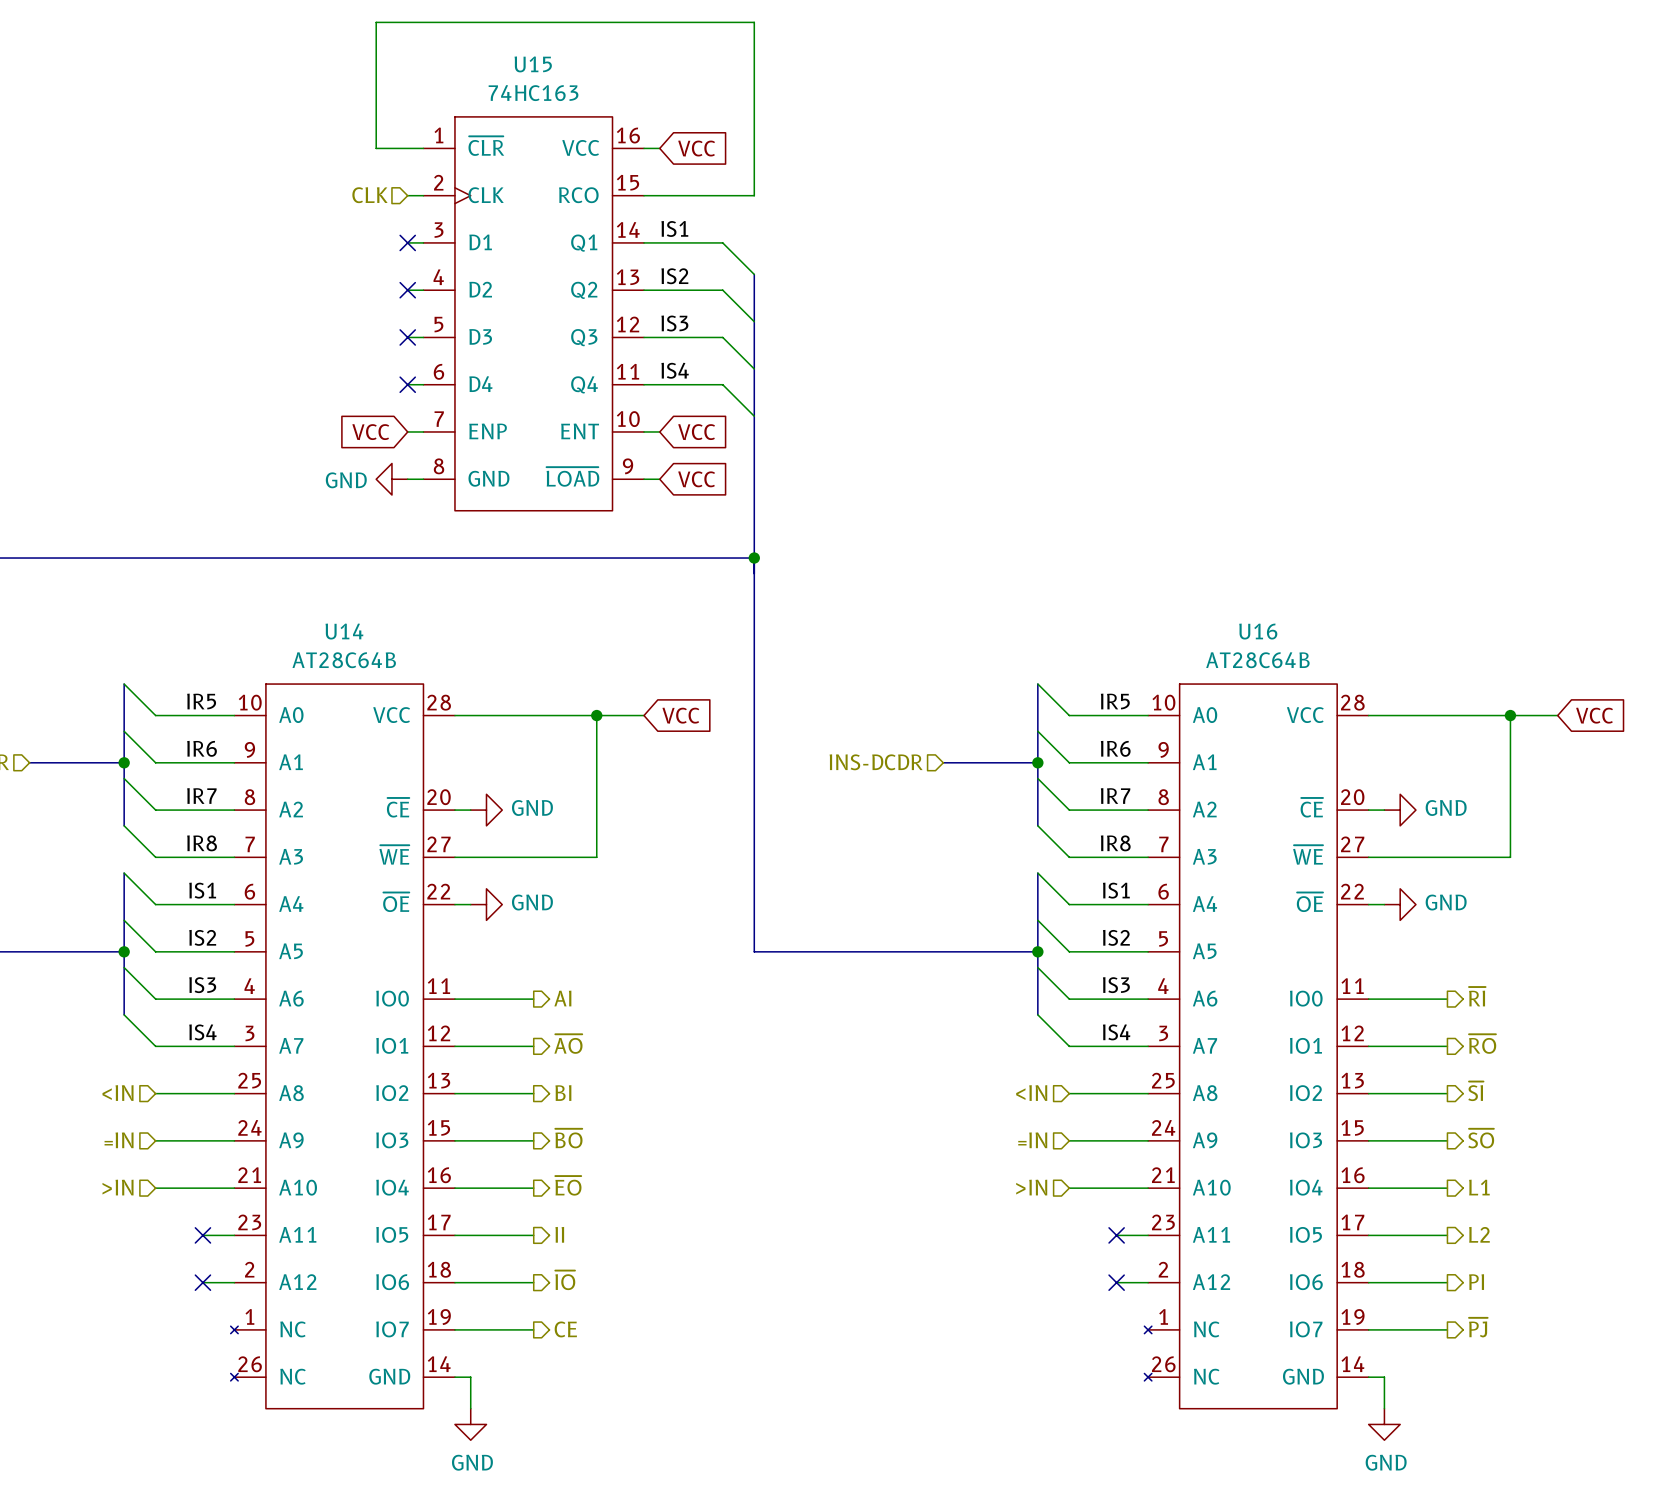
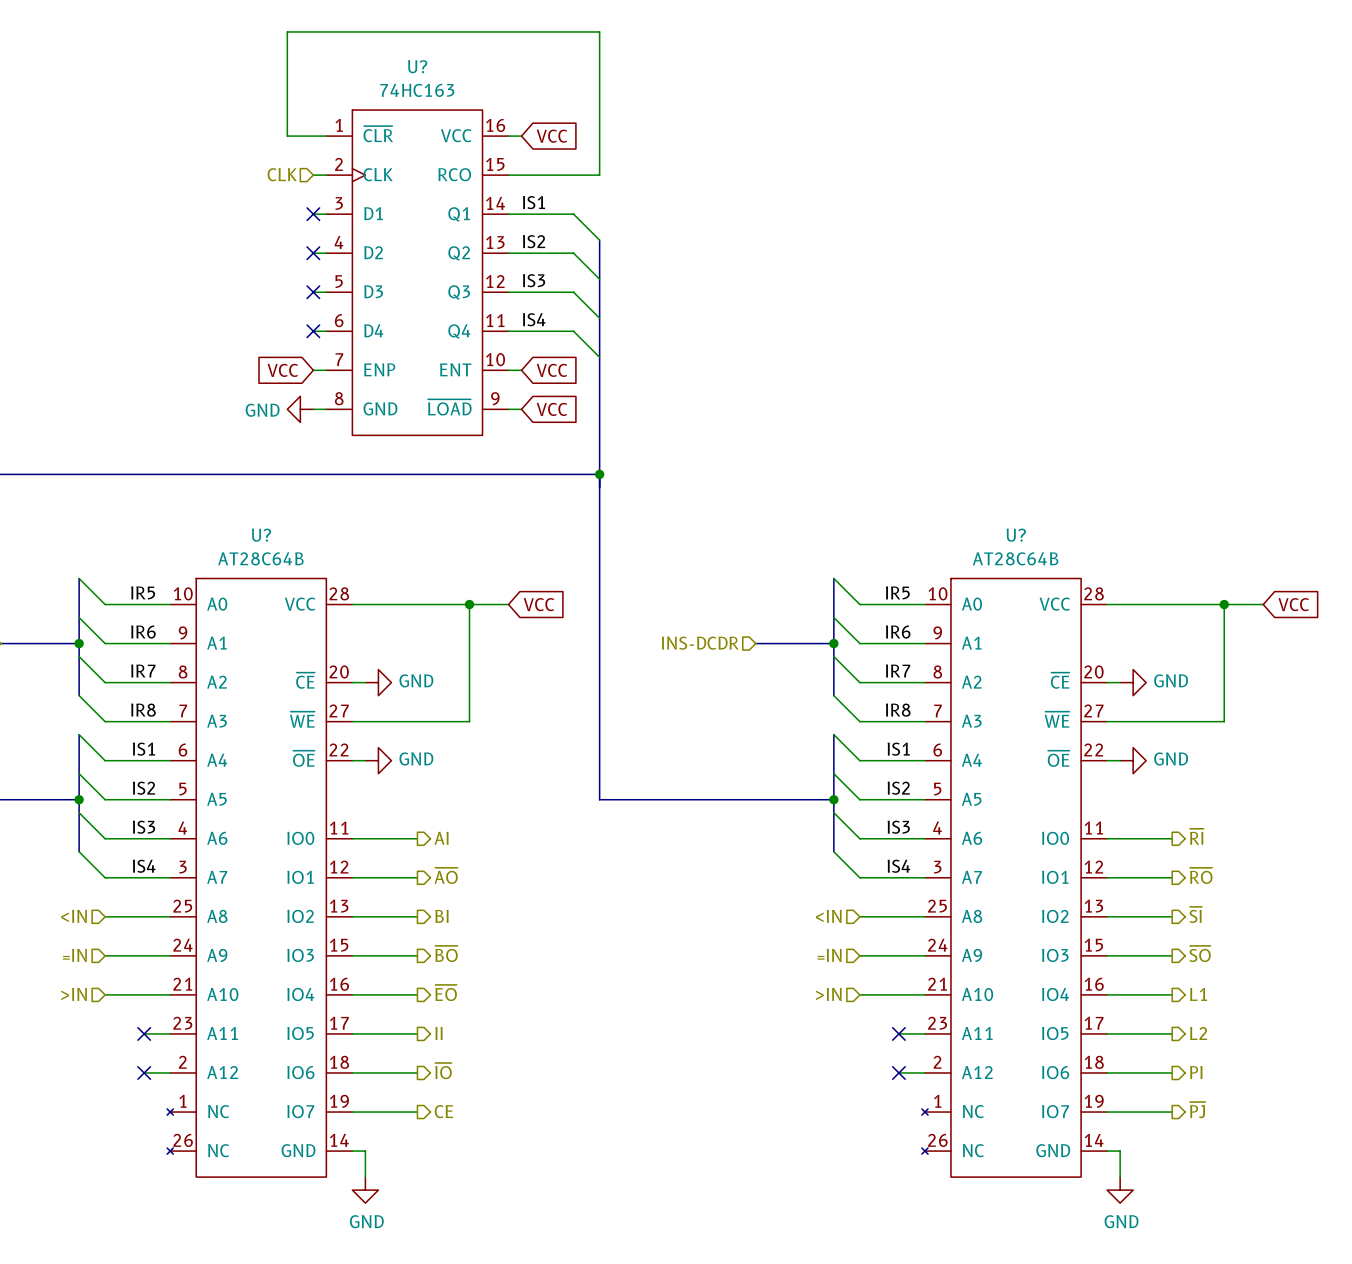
U15 name: U15 (533, 64) -> U? (417, 66)
U14 name: U14 (344, 631) -> U? (261, 535)
U16 name: U16 (1258, 631) -> U? (1016, 535)

